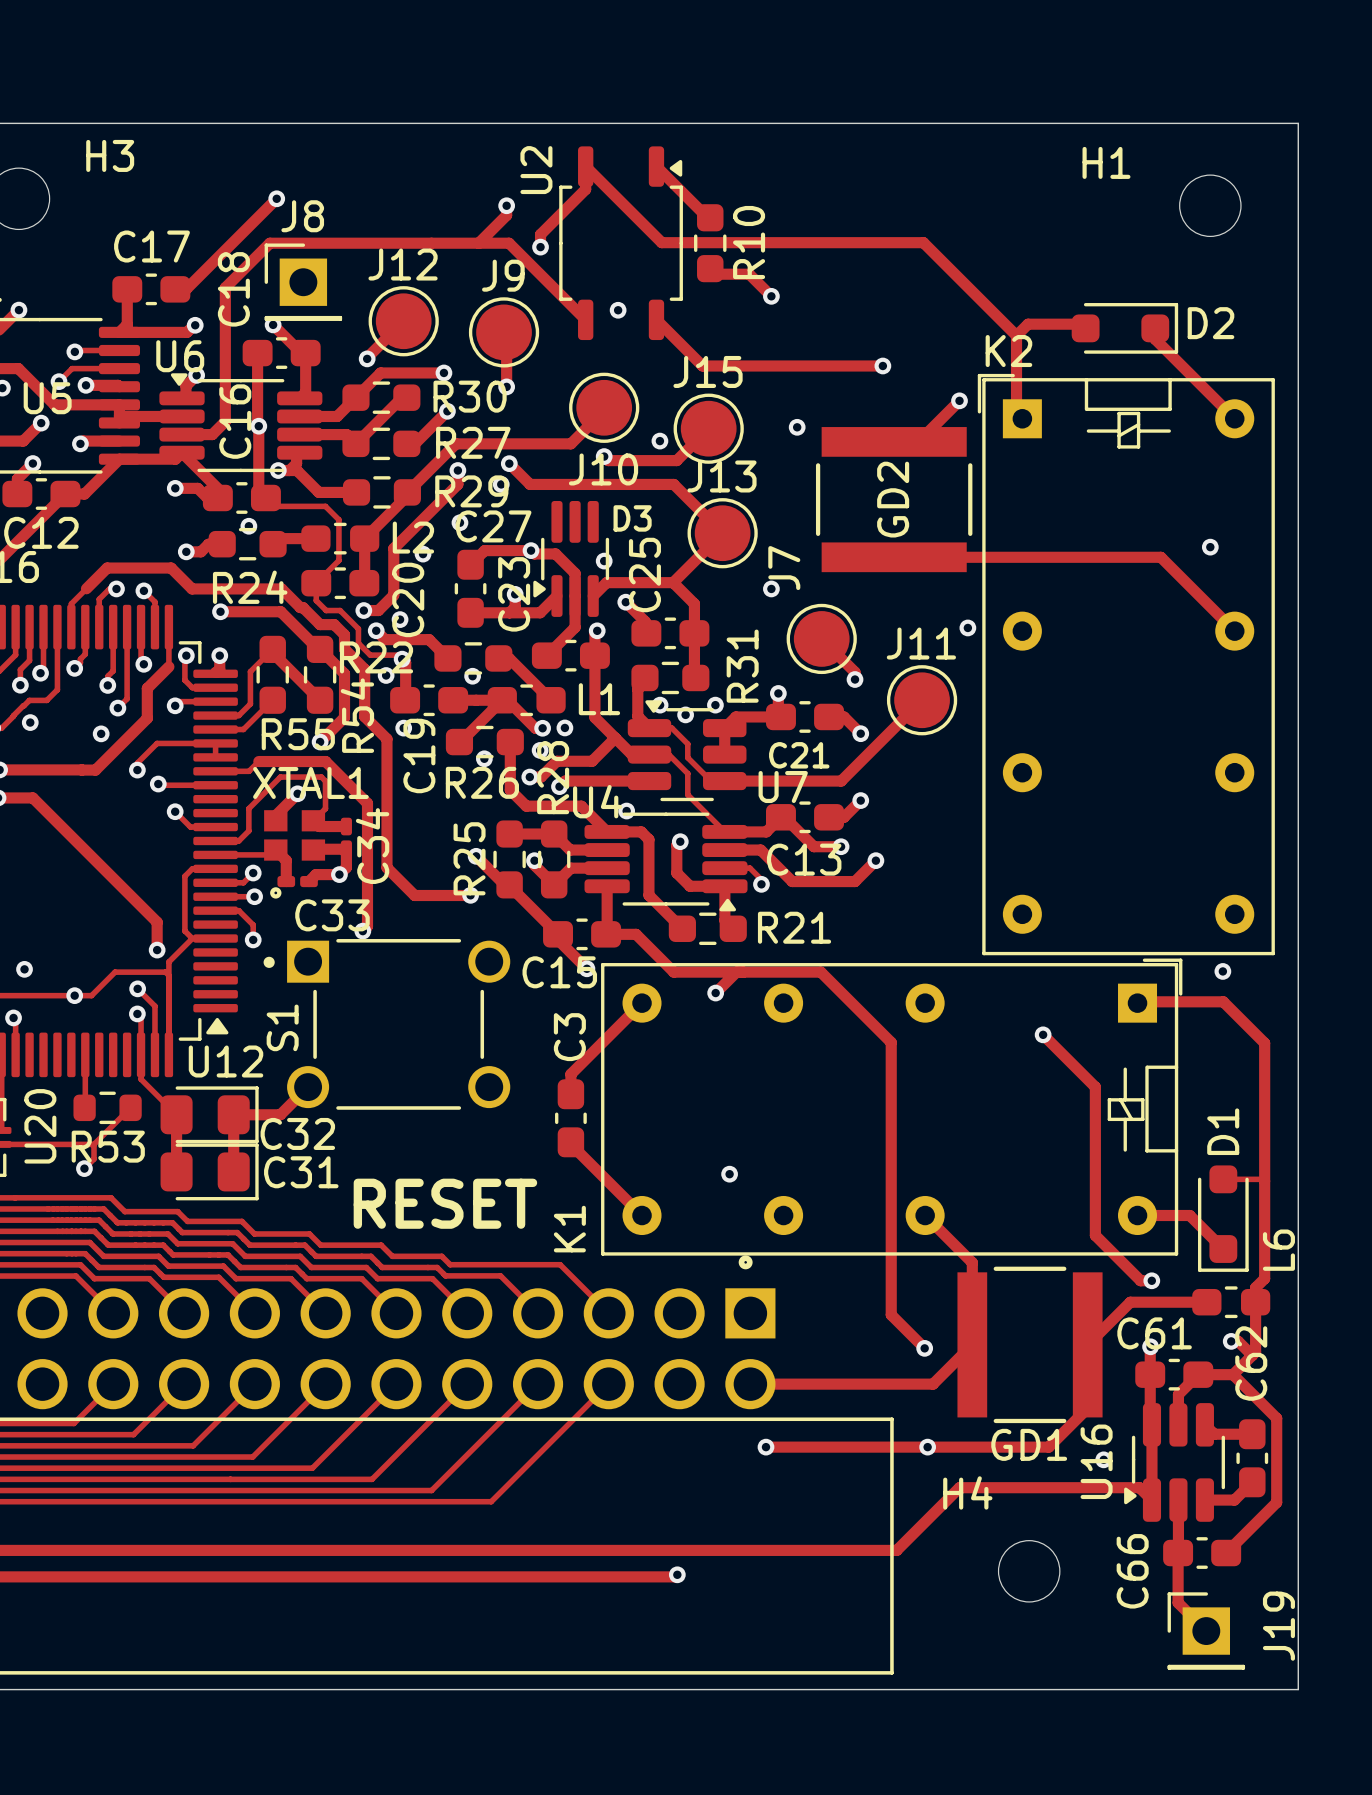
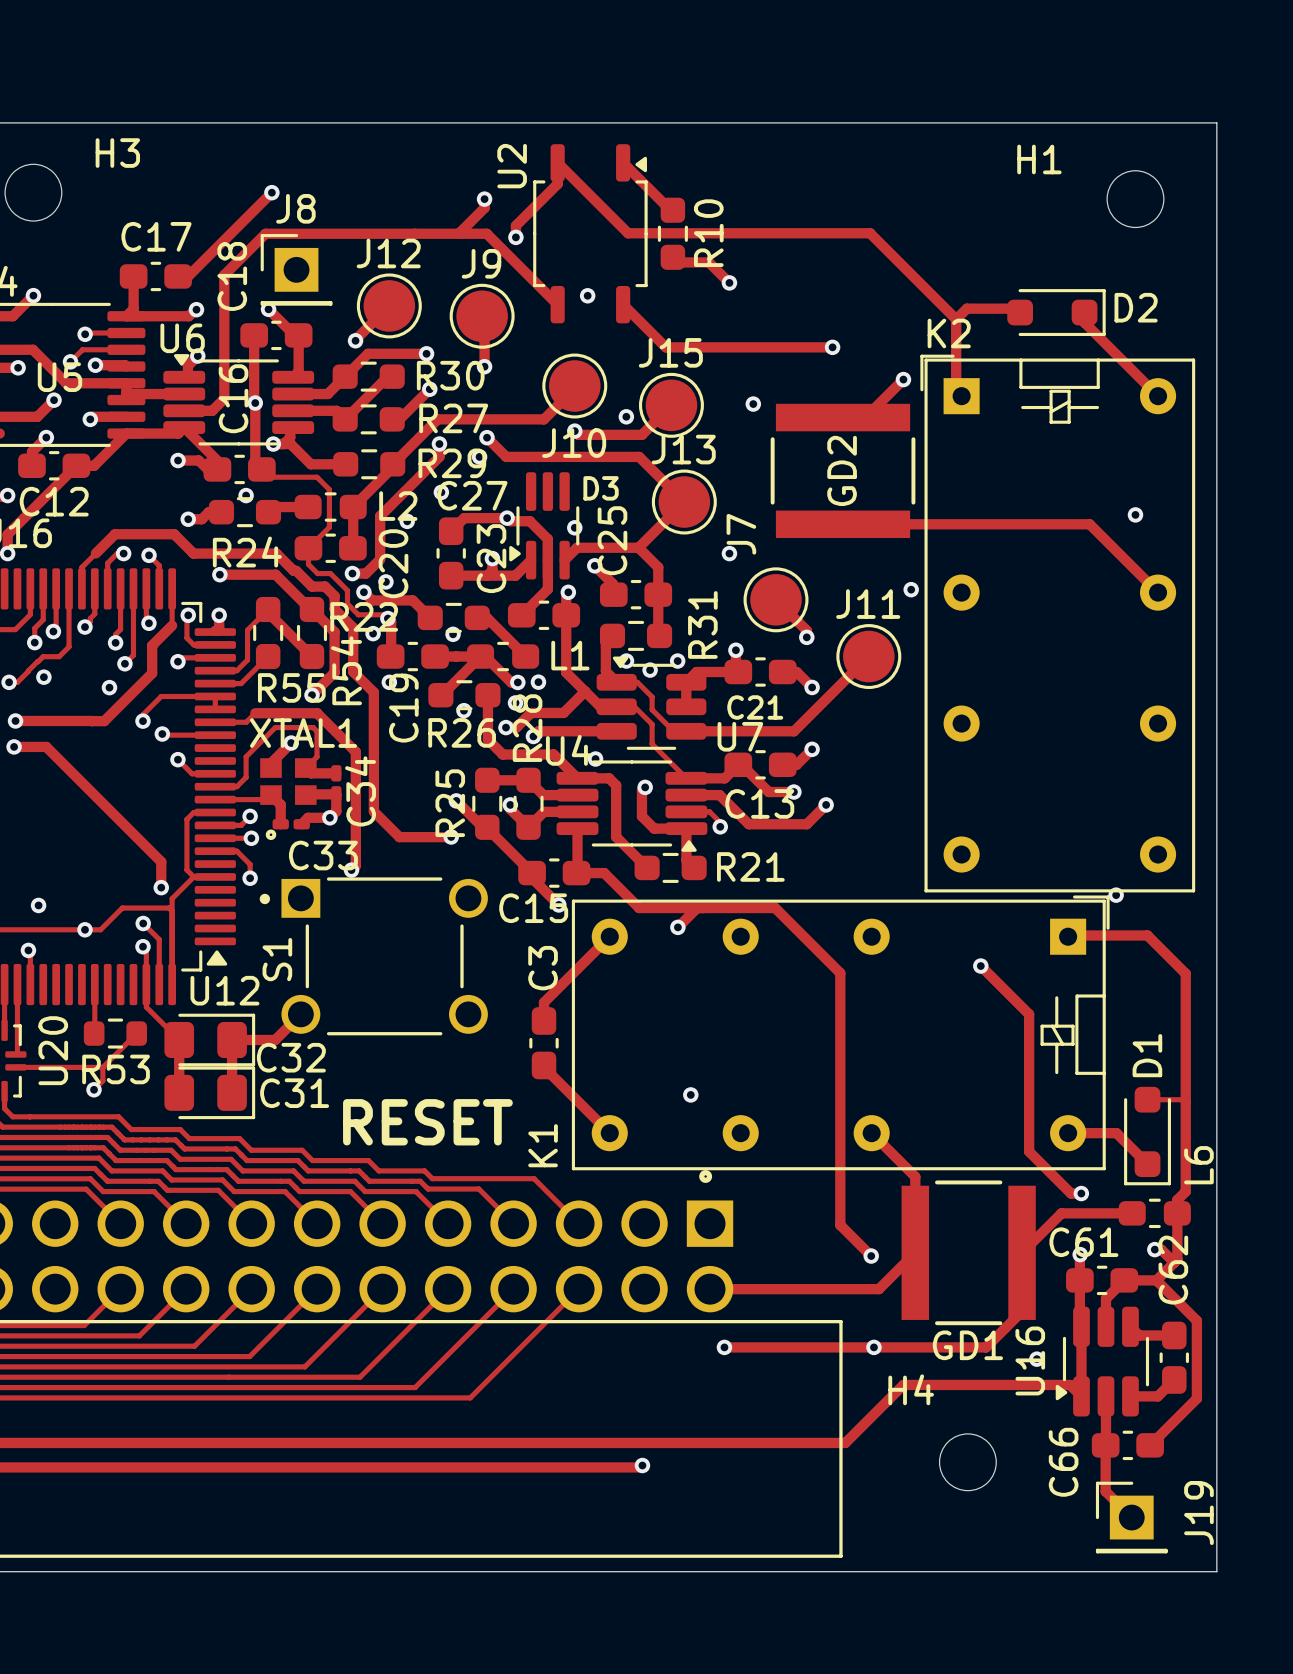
via position: (1222, 971) -> (1116, 895)

